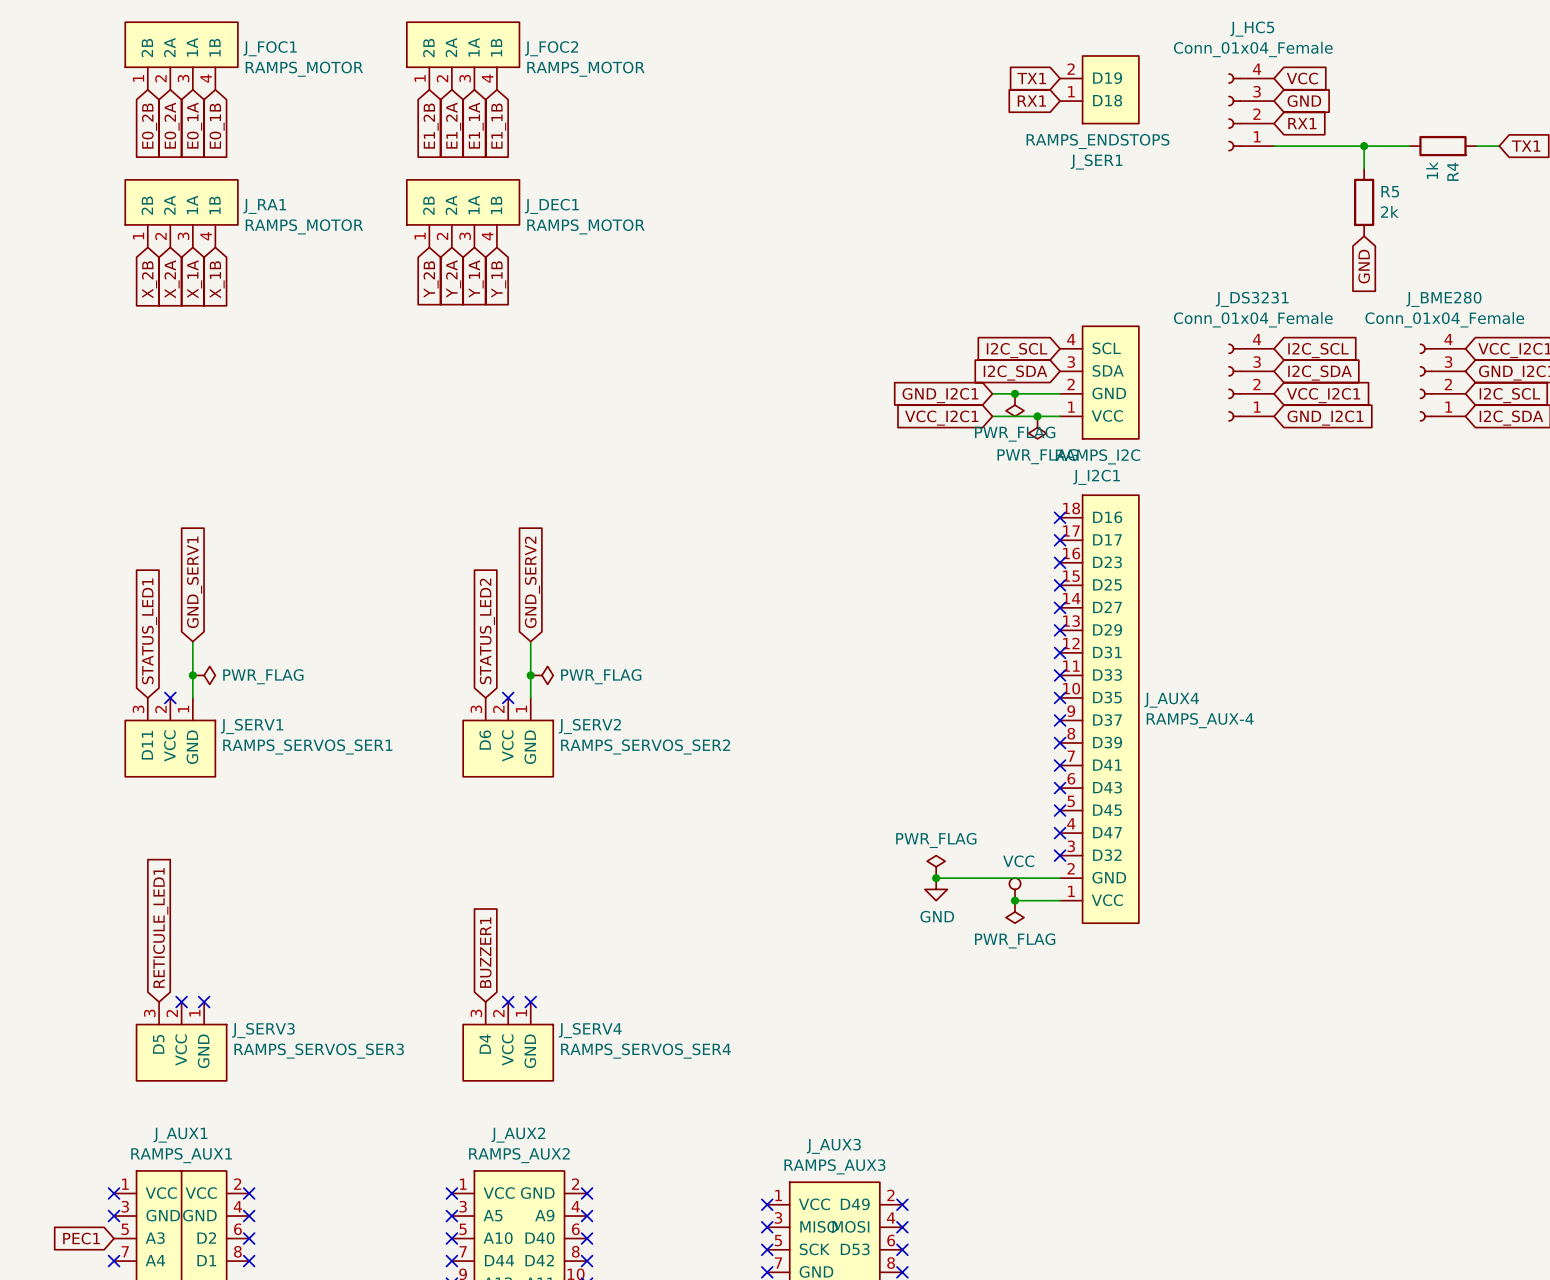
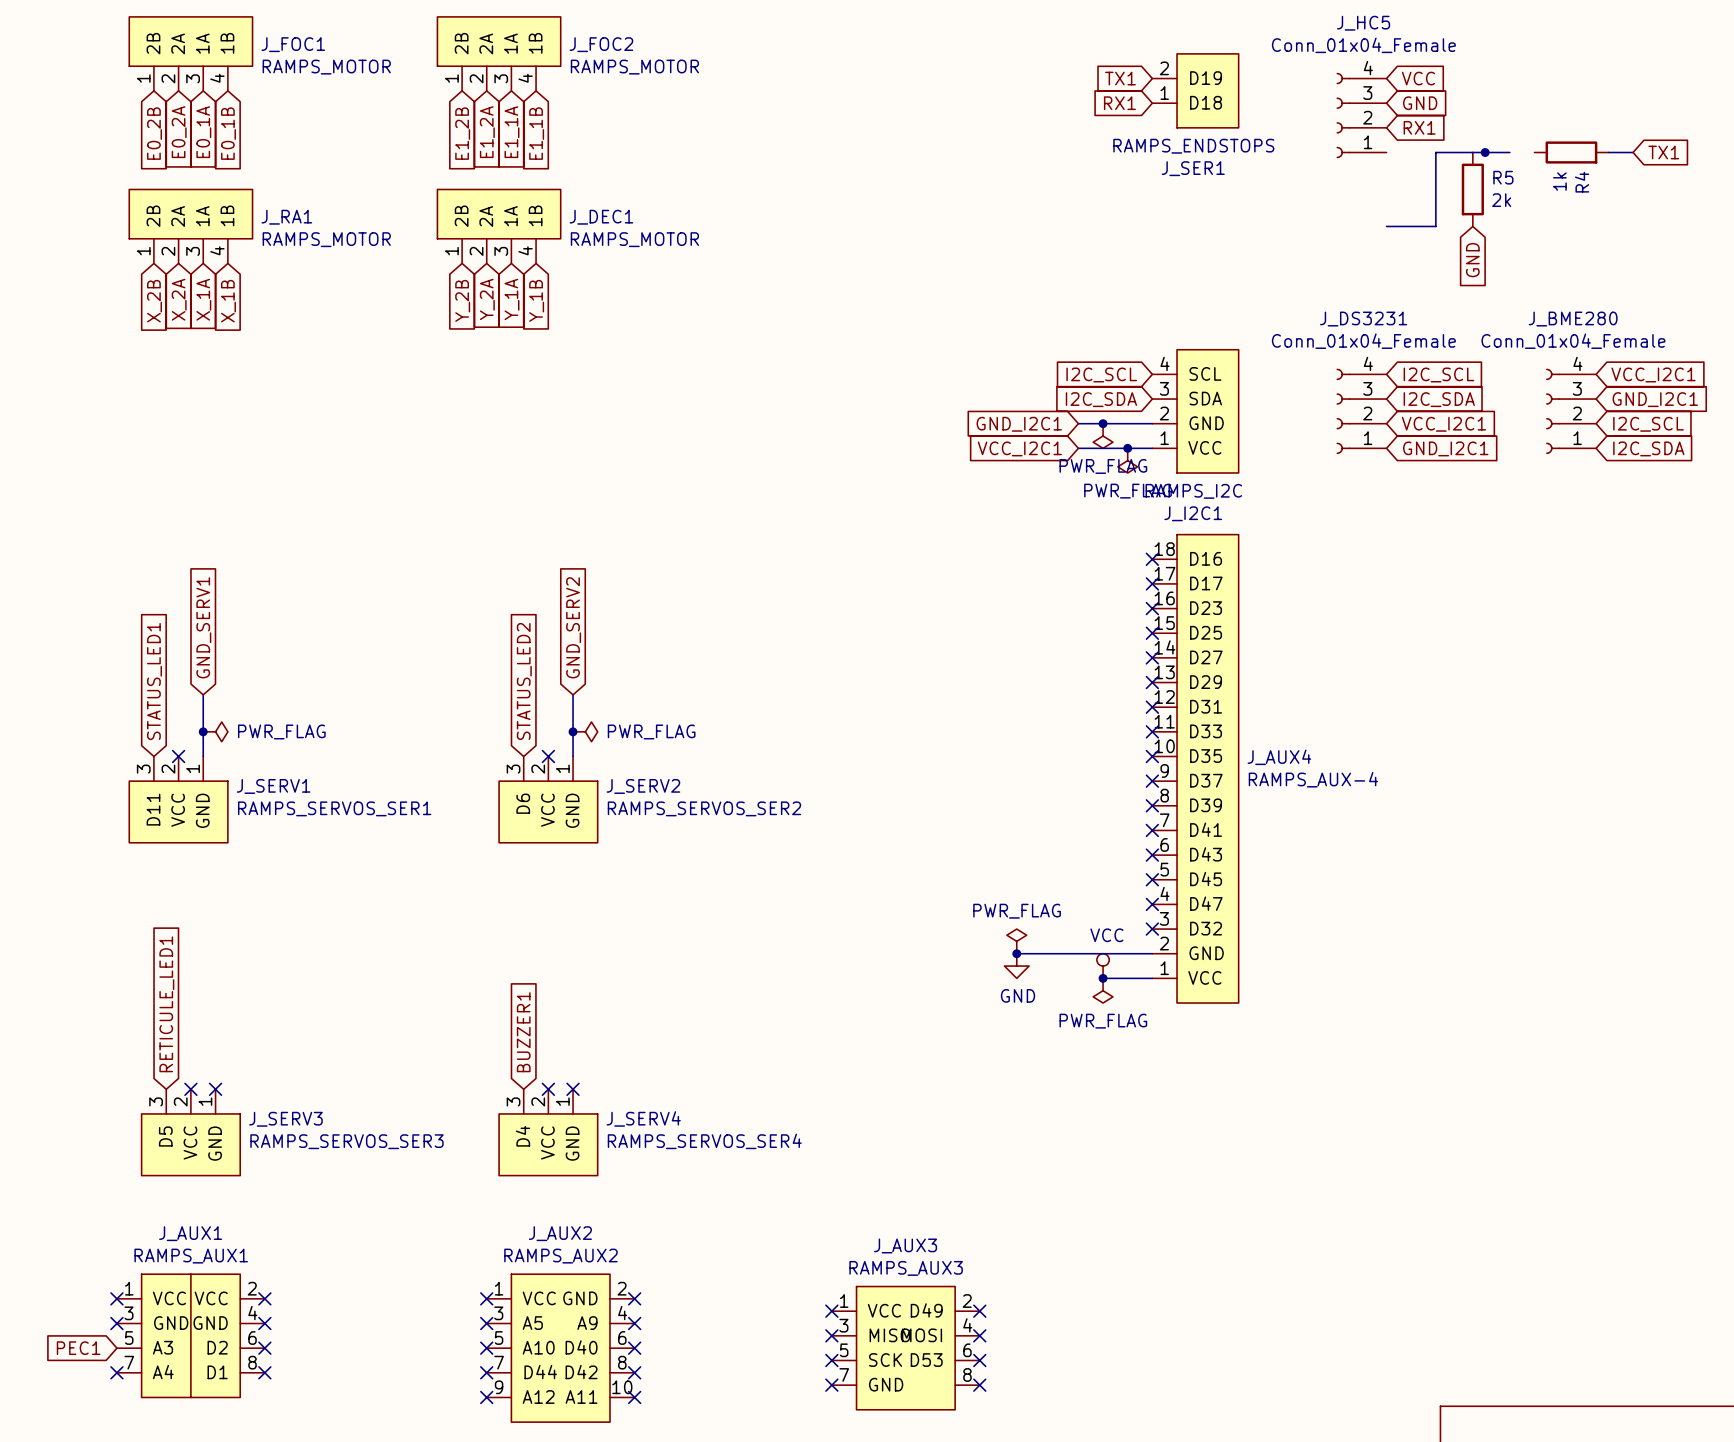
wire: (1274, 146) (1319, 146) -> (1386, 226) (1435, 226) (1435, 152)
wire: (1364, 146) (1364, 168) -> none
wire: (1386, 146) (1409, 146) -> none
R5 position: (1364, 202) -> (1472, 189)
global label position: GND (1364, 266) -> GND (1472, 260)

